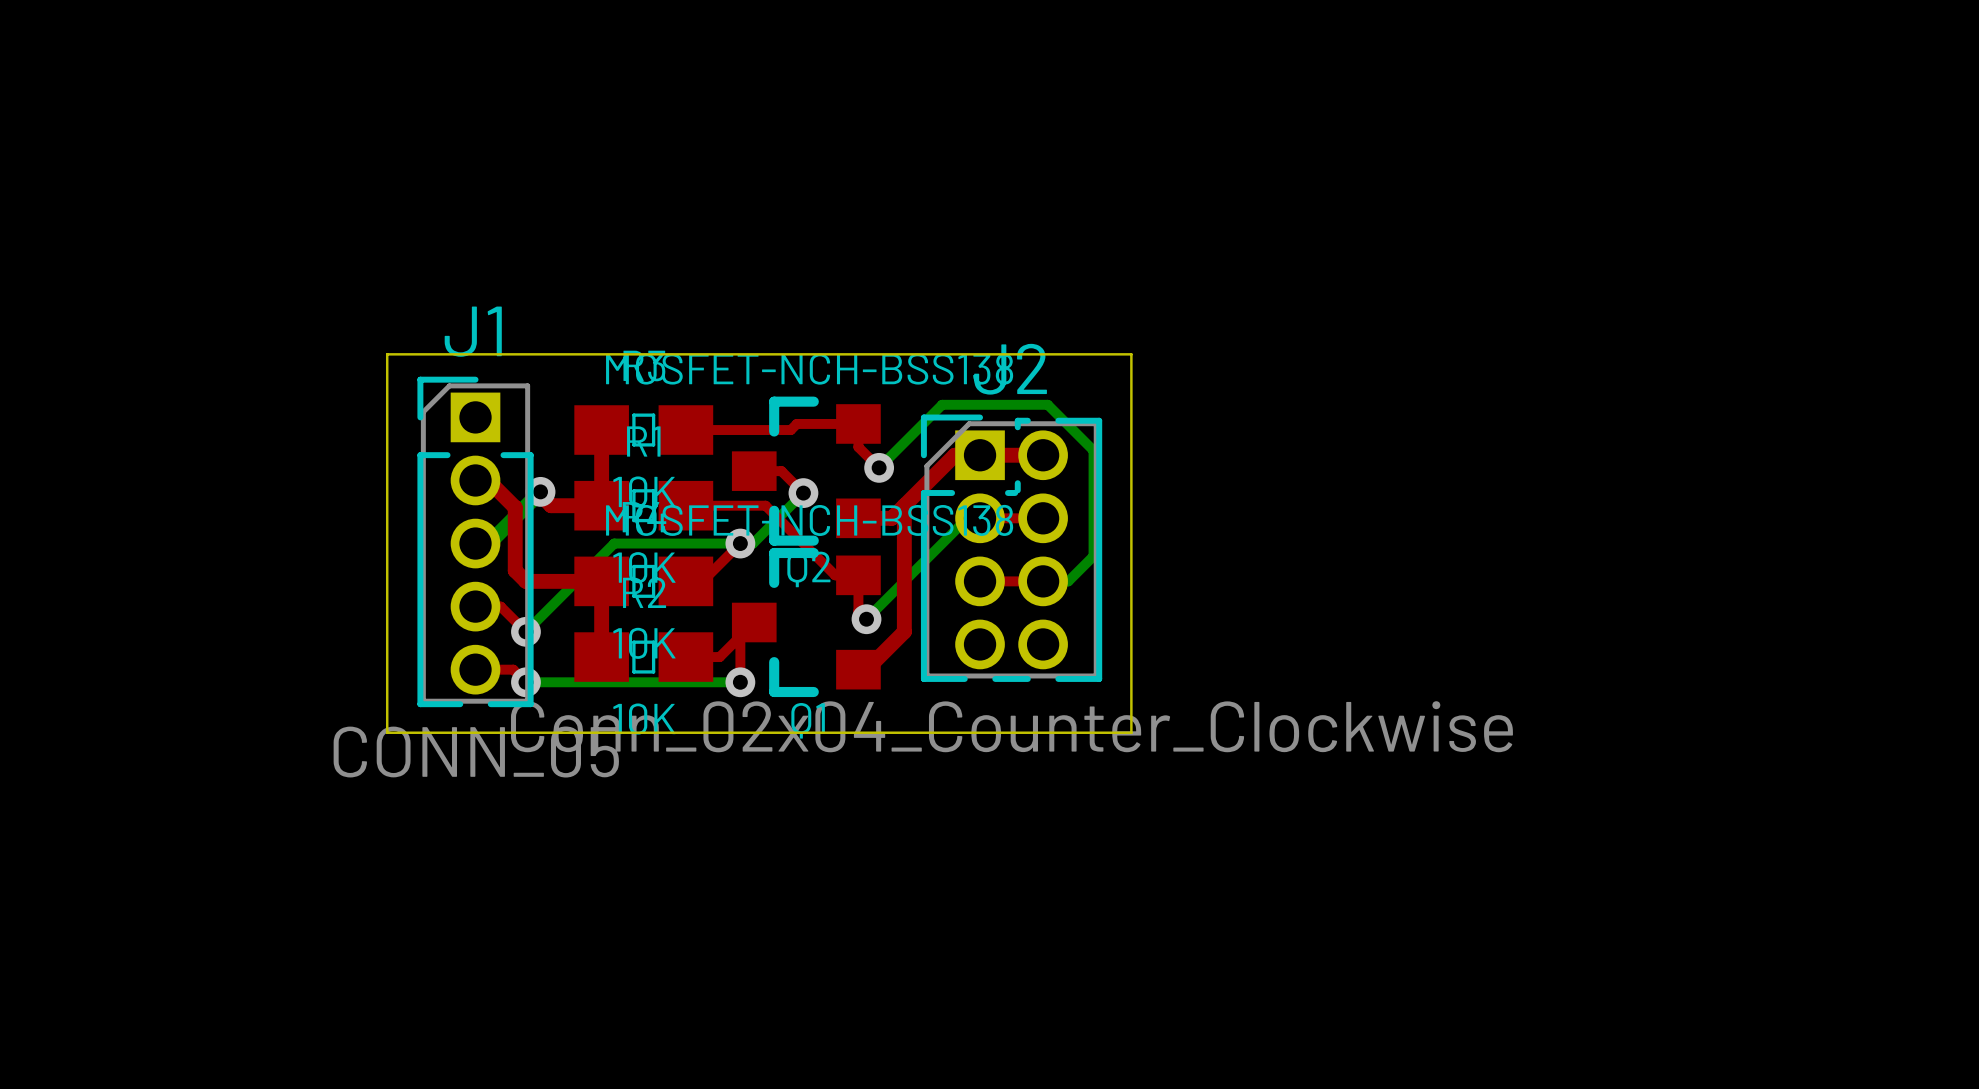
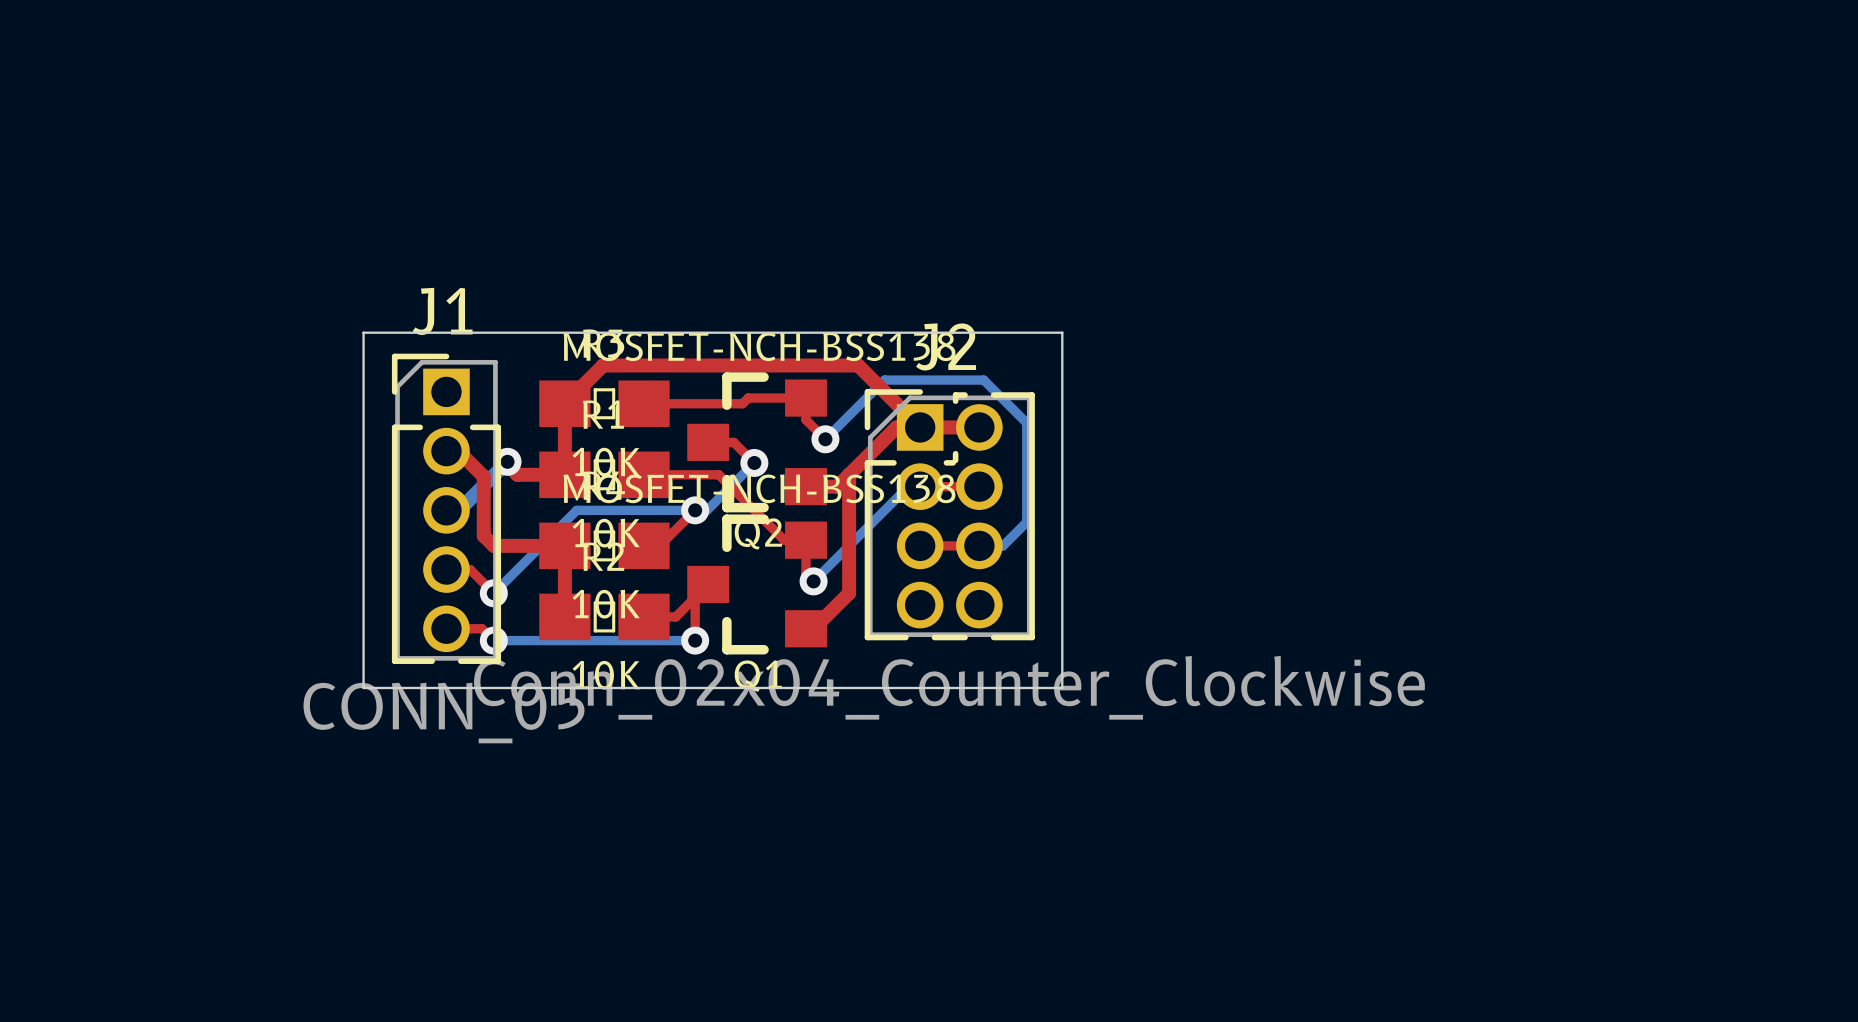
top track: none -> (564, 403) (603, 365) (858, 365) (920, 427)

